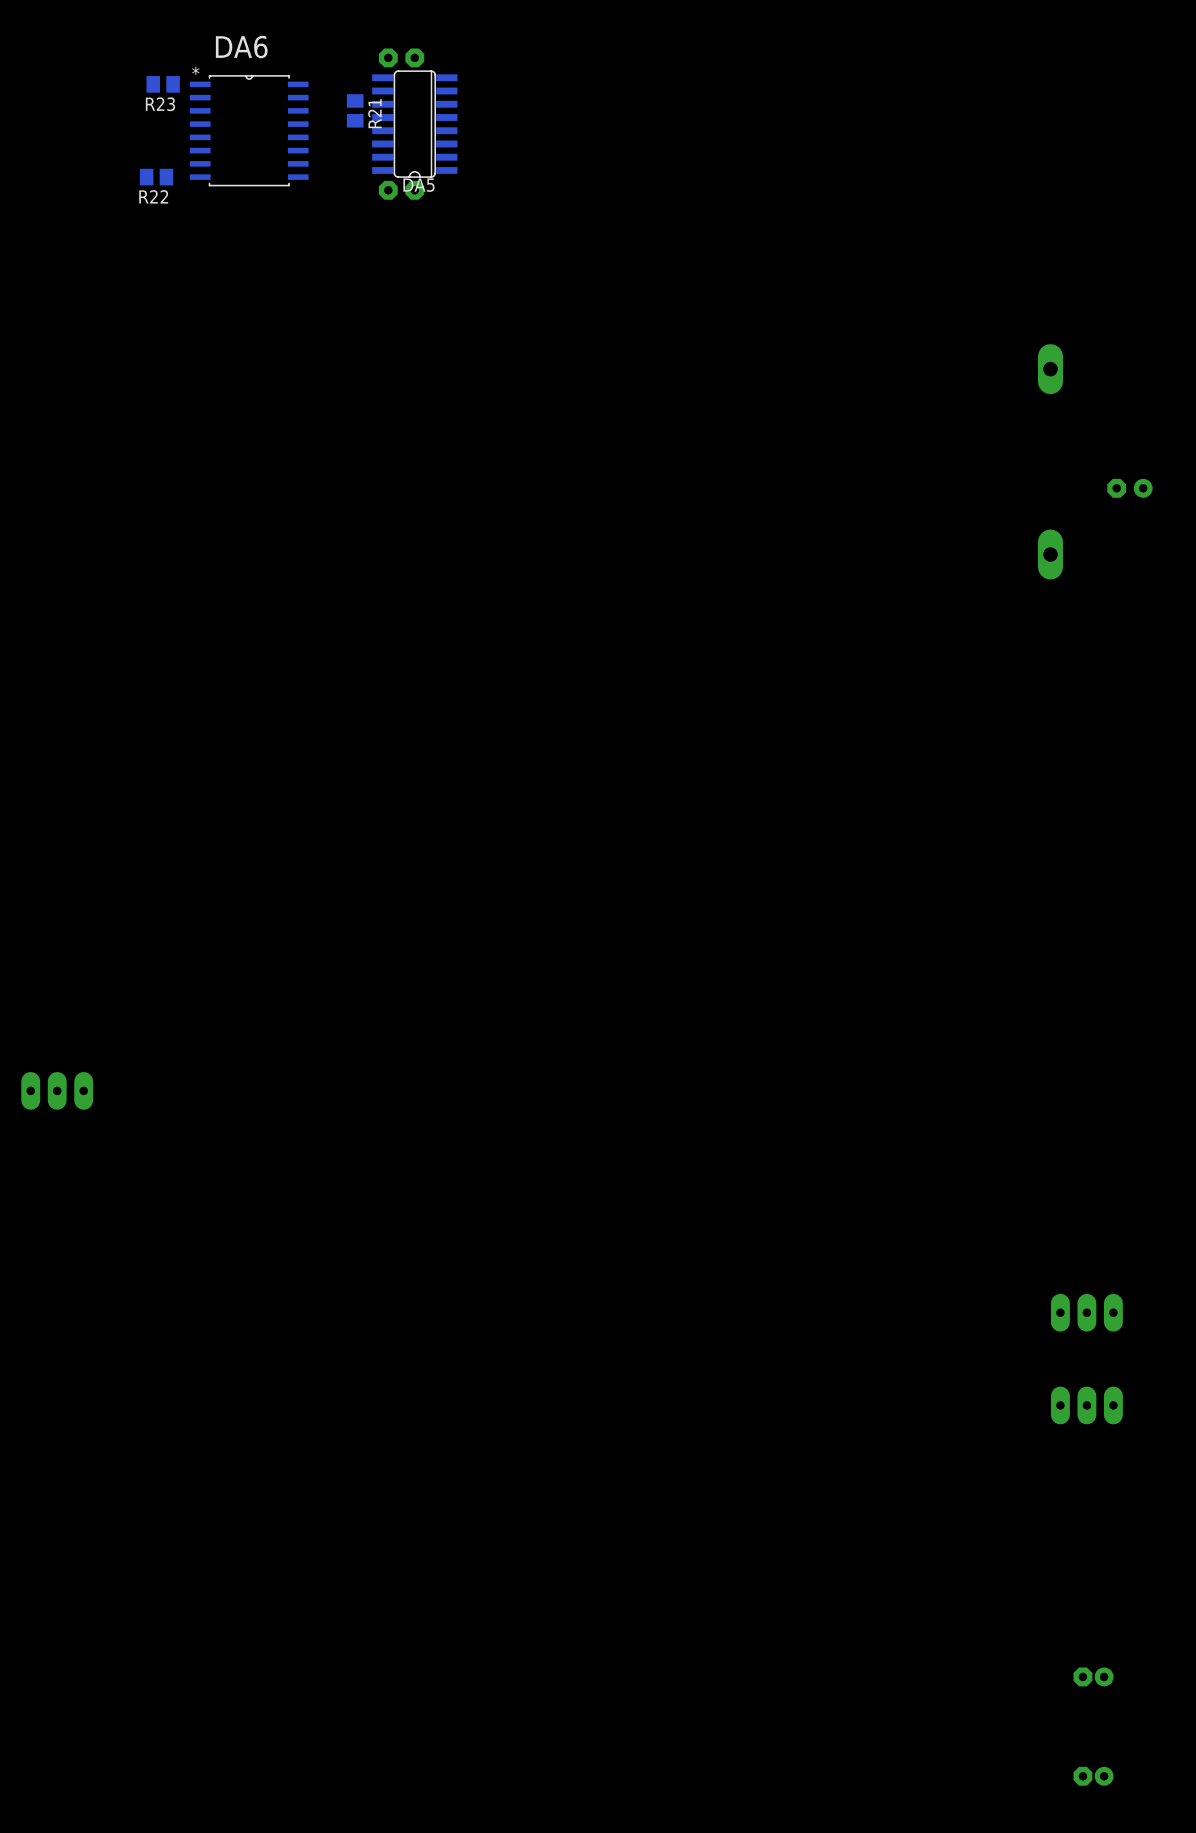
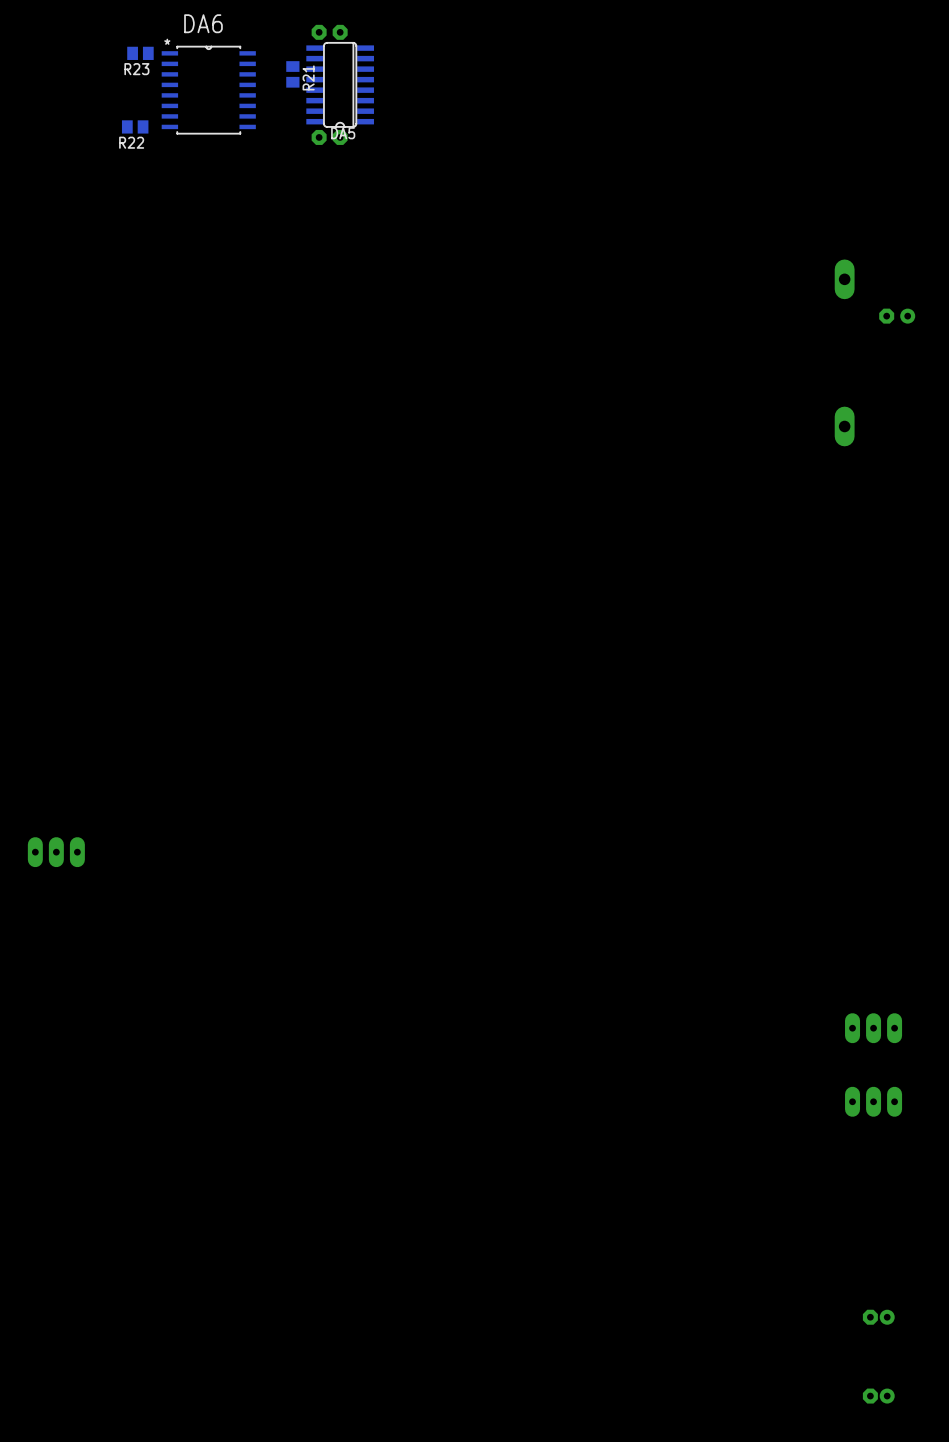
part position: (1129, 488) -> (897, 316)

